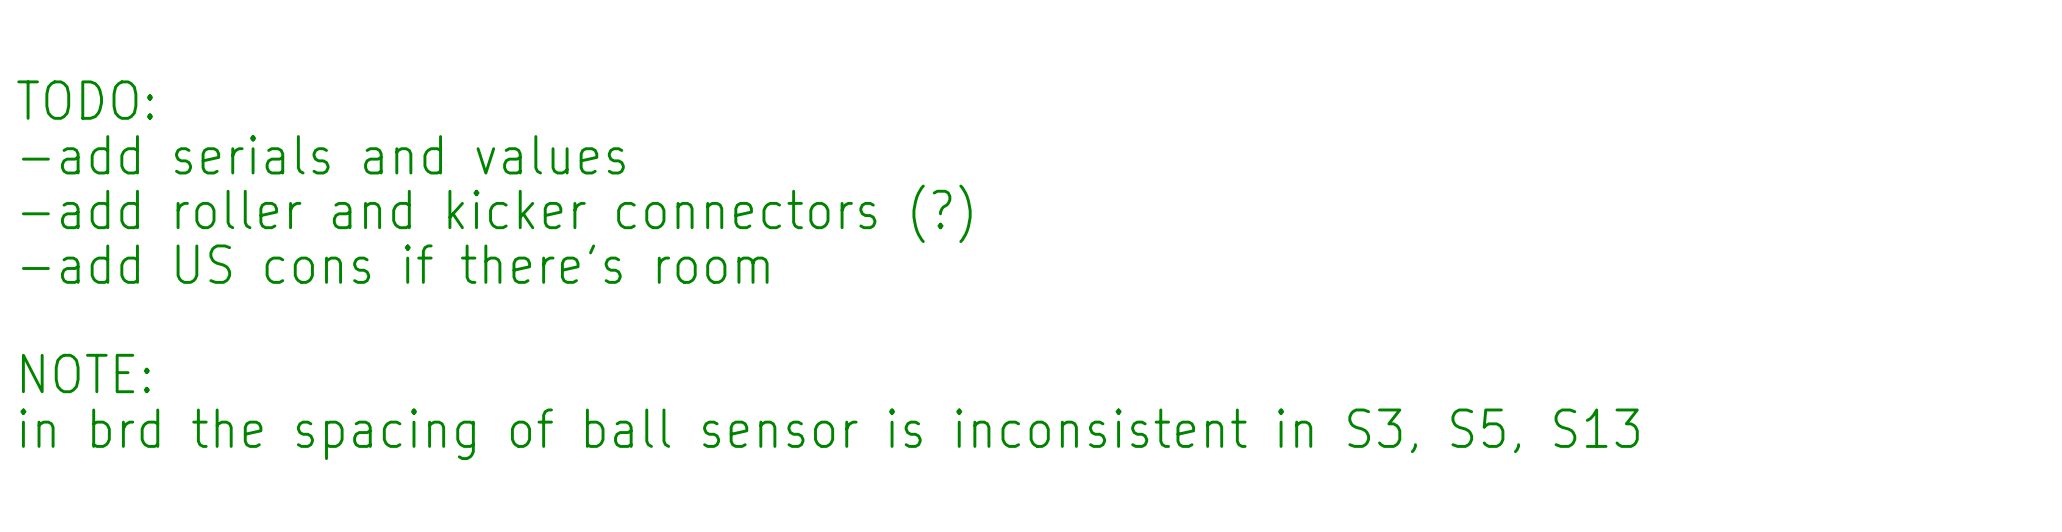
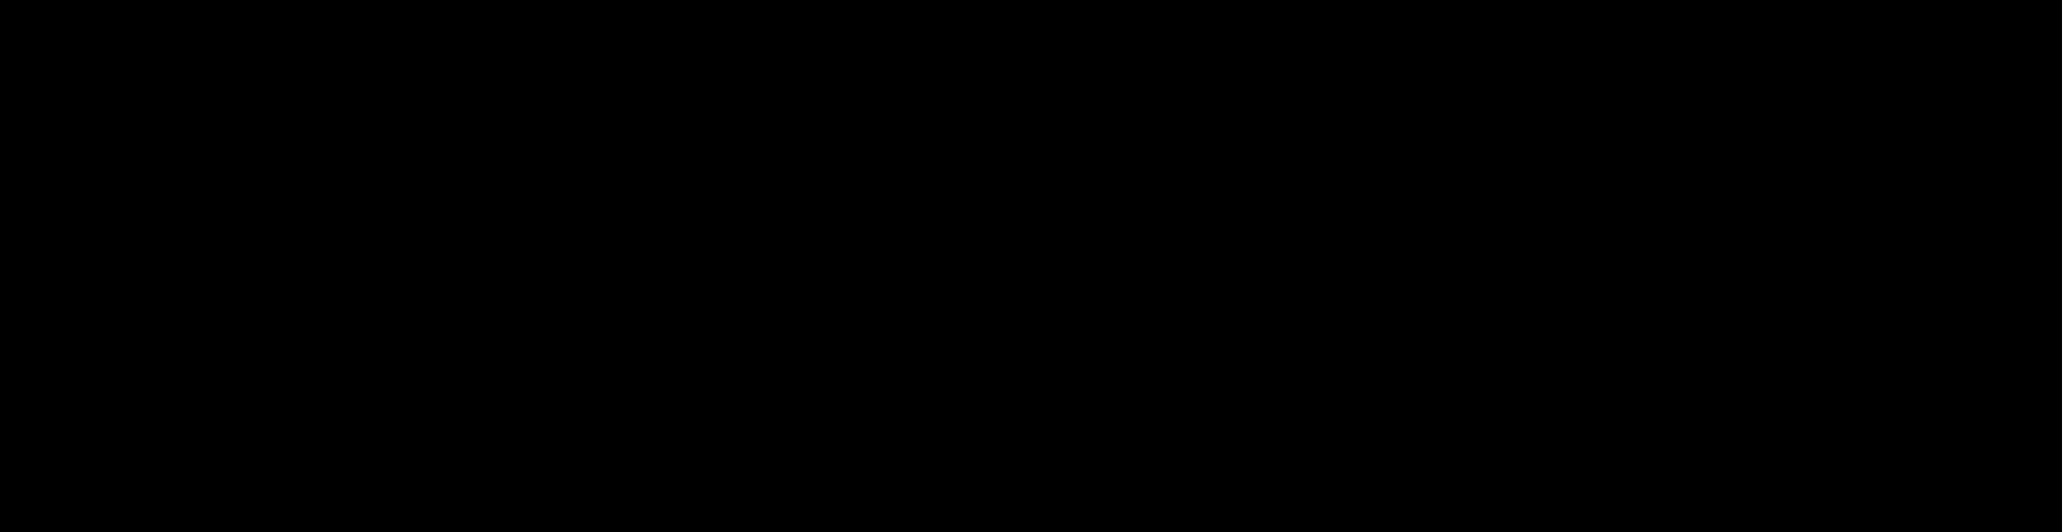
text: TODO: (85, 100) -> none
text: -add serials and values (323, 154) -> none
text: -add roller and kicker connectors (?) (496, 213) -> none
text: -add US cons if there's room (395, 264) -> none
text: NOTE: (85, 373) -> none
text: in brd the spacing of ball sensor is inconsistent in S3, S5, S13 (829, 434) -> none

